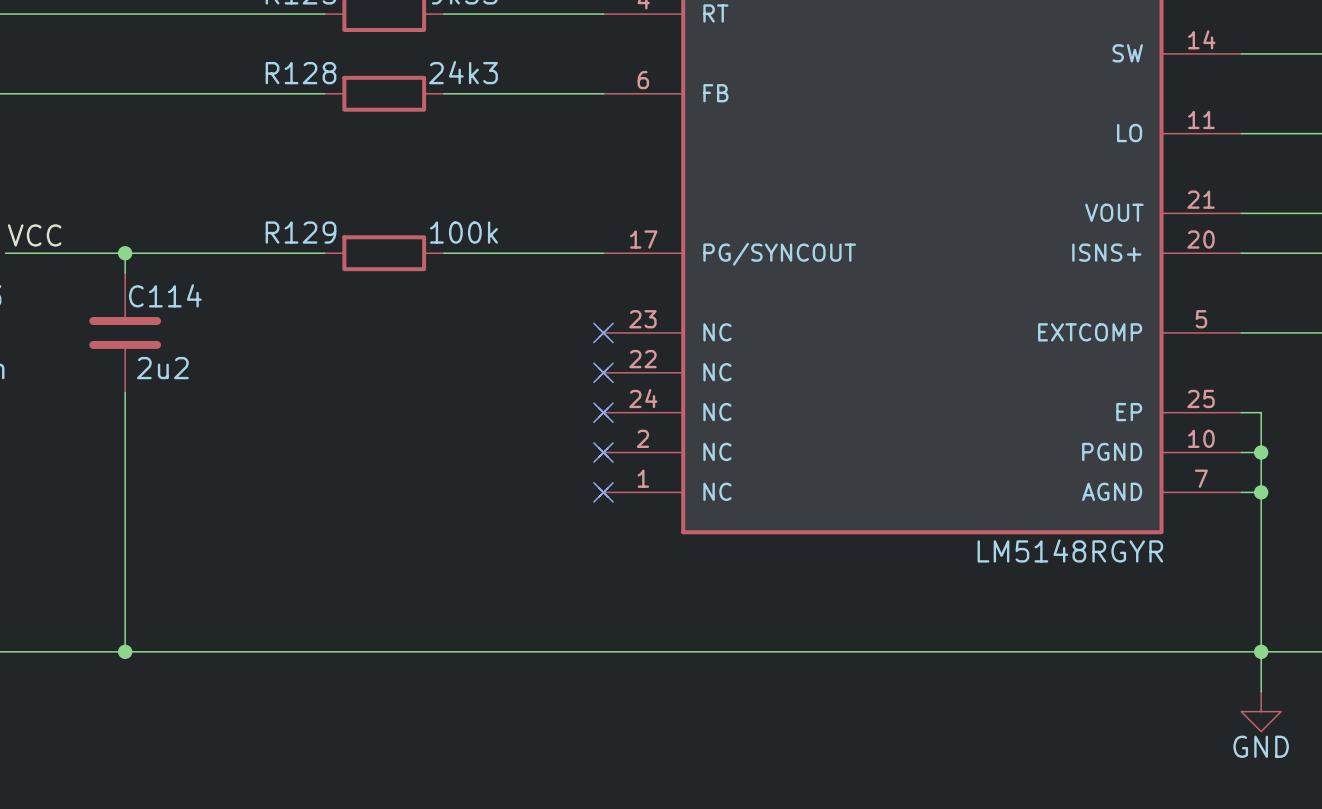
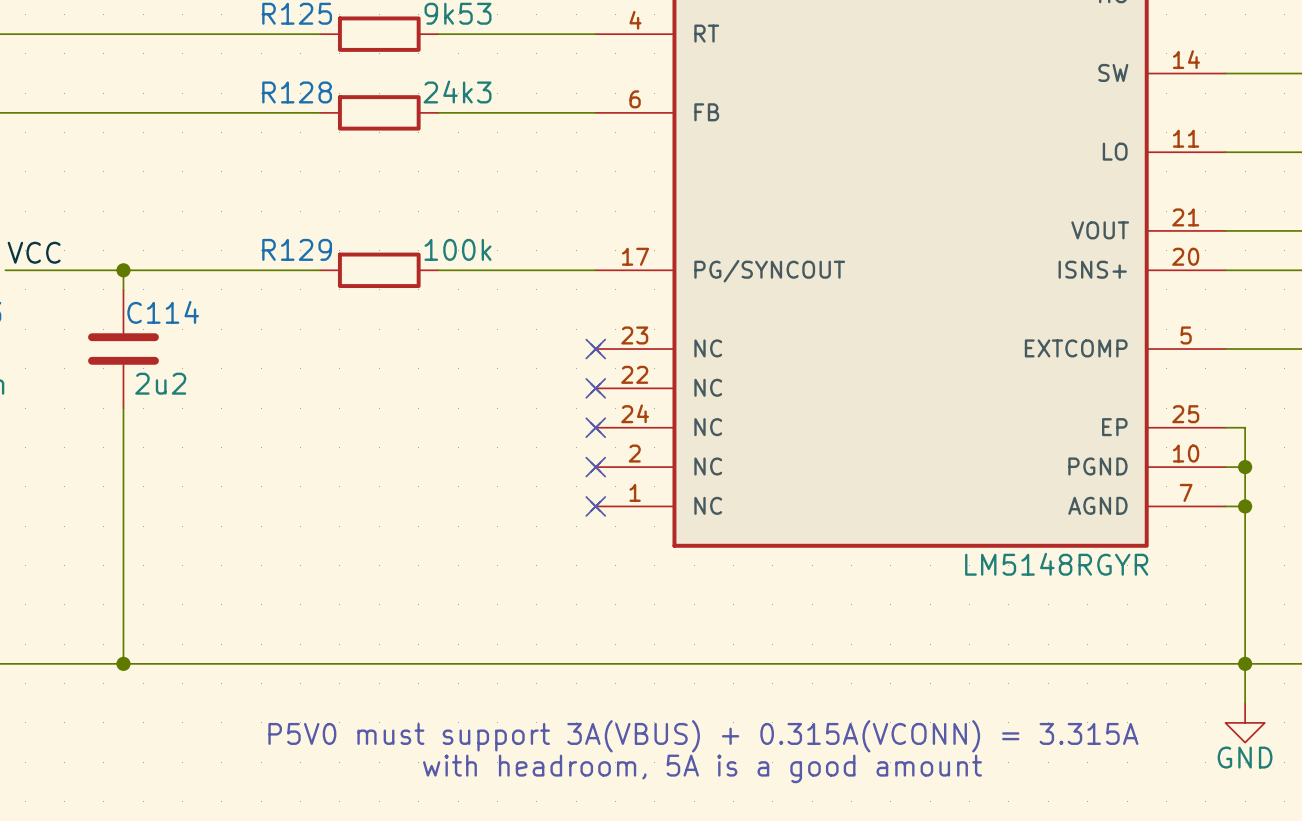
text: none -> P5V0 must support 3A(VBUS) + 0.315A(VCONN) = 3.315A (703, 736)
text: none -> with headroom, 5A is a good amount (702, 768)

